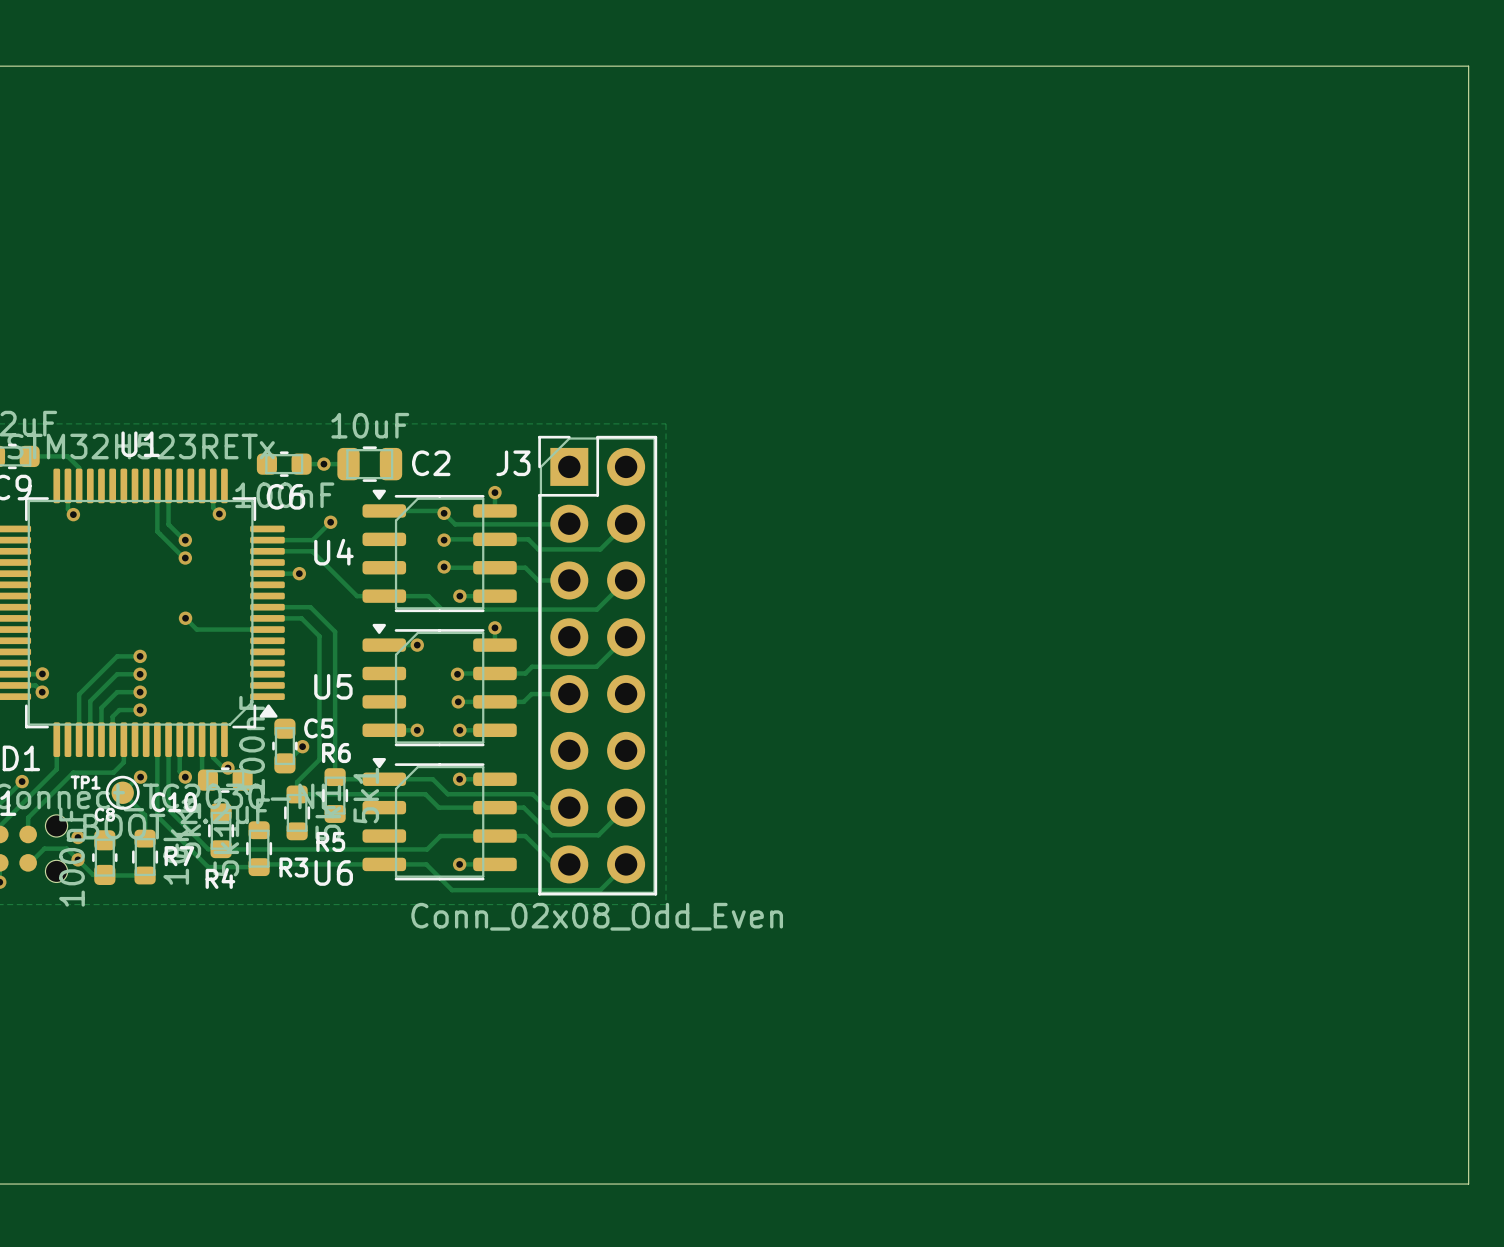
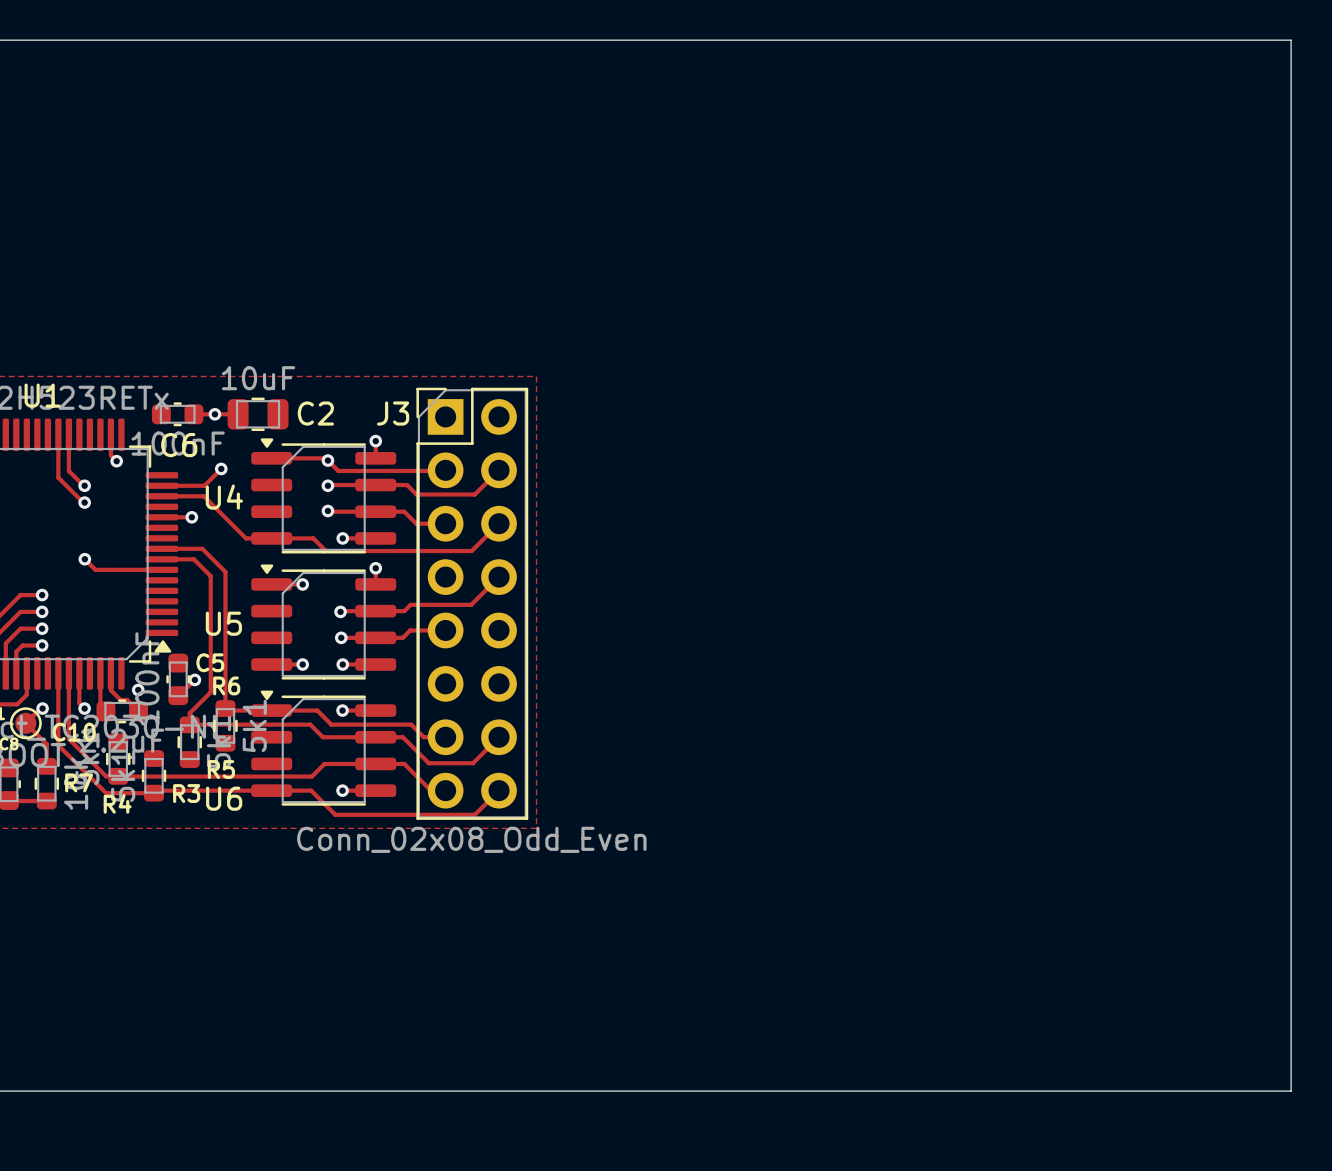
via position: (227, 768) -> (138, 690)

